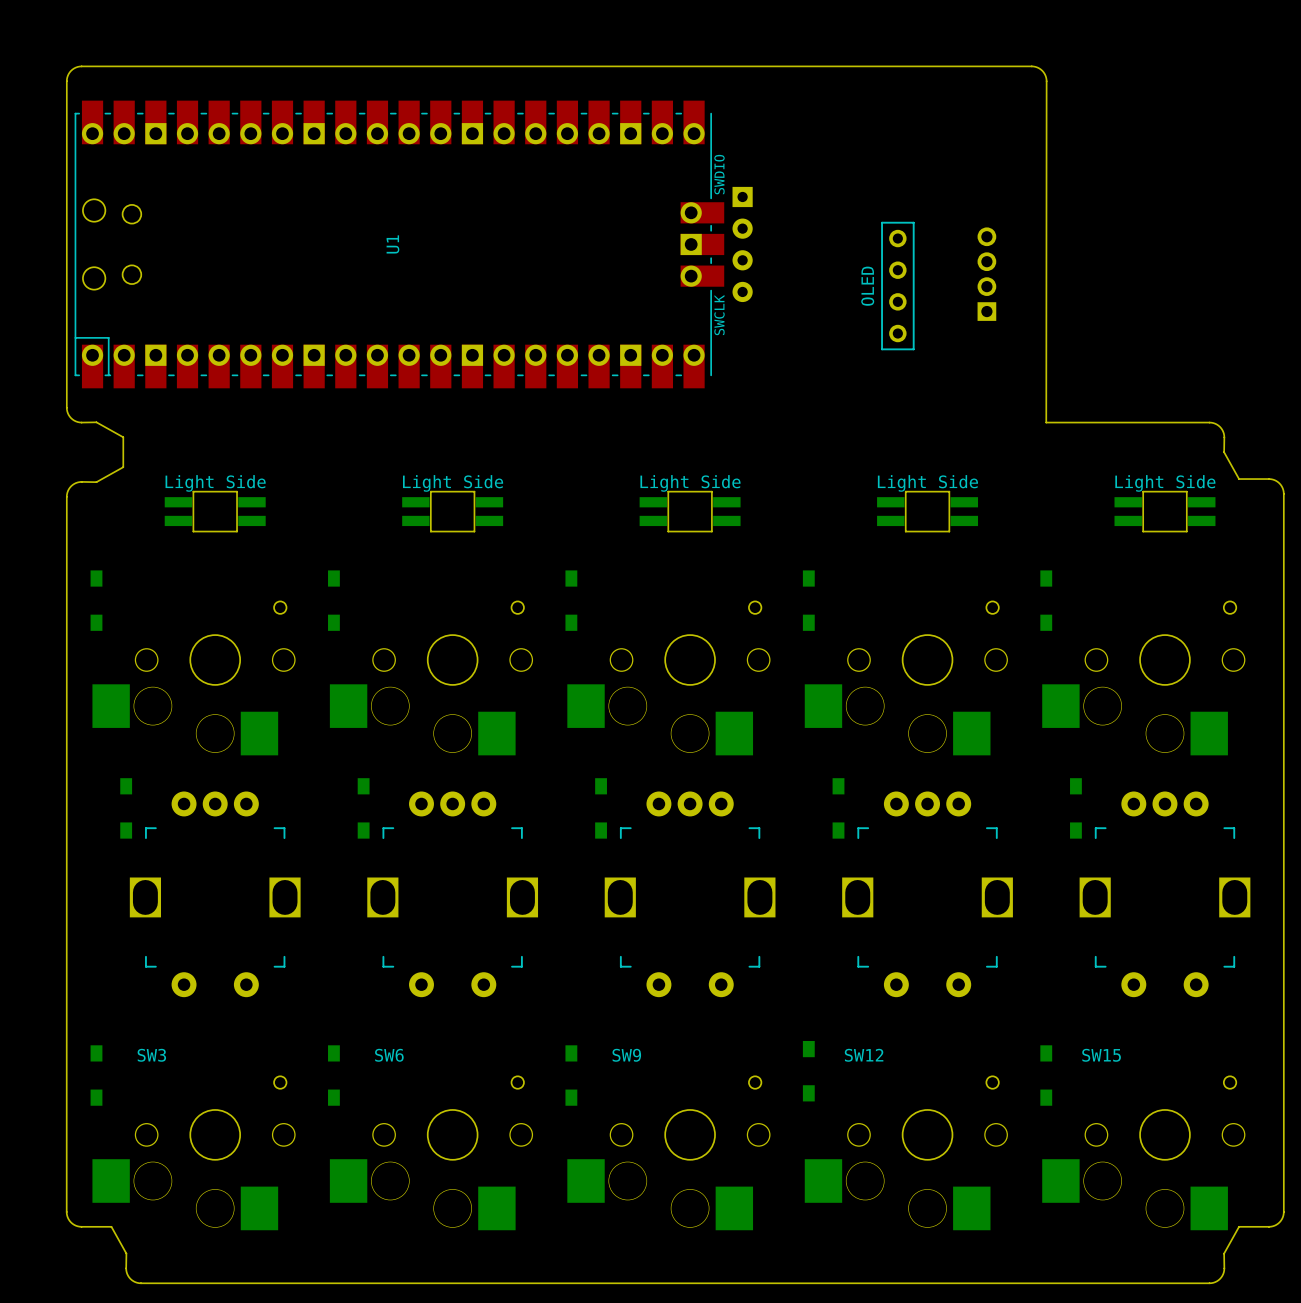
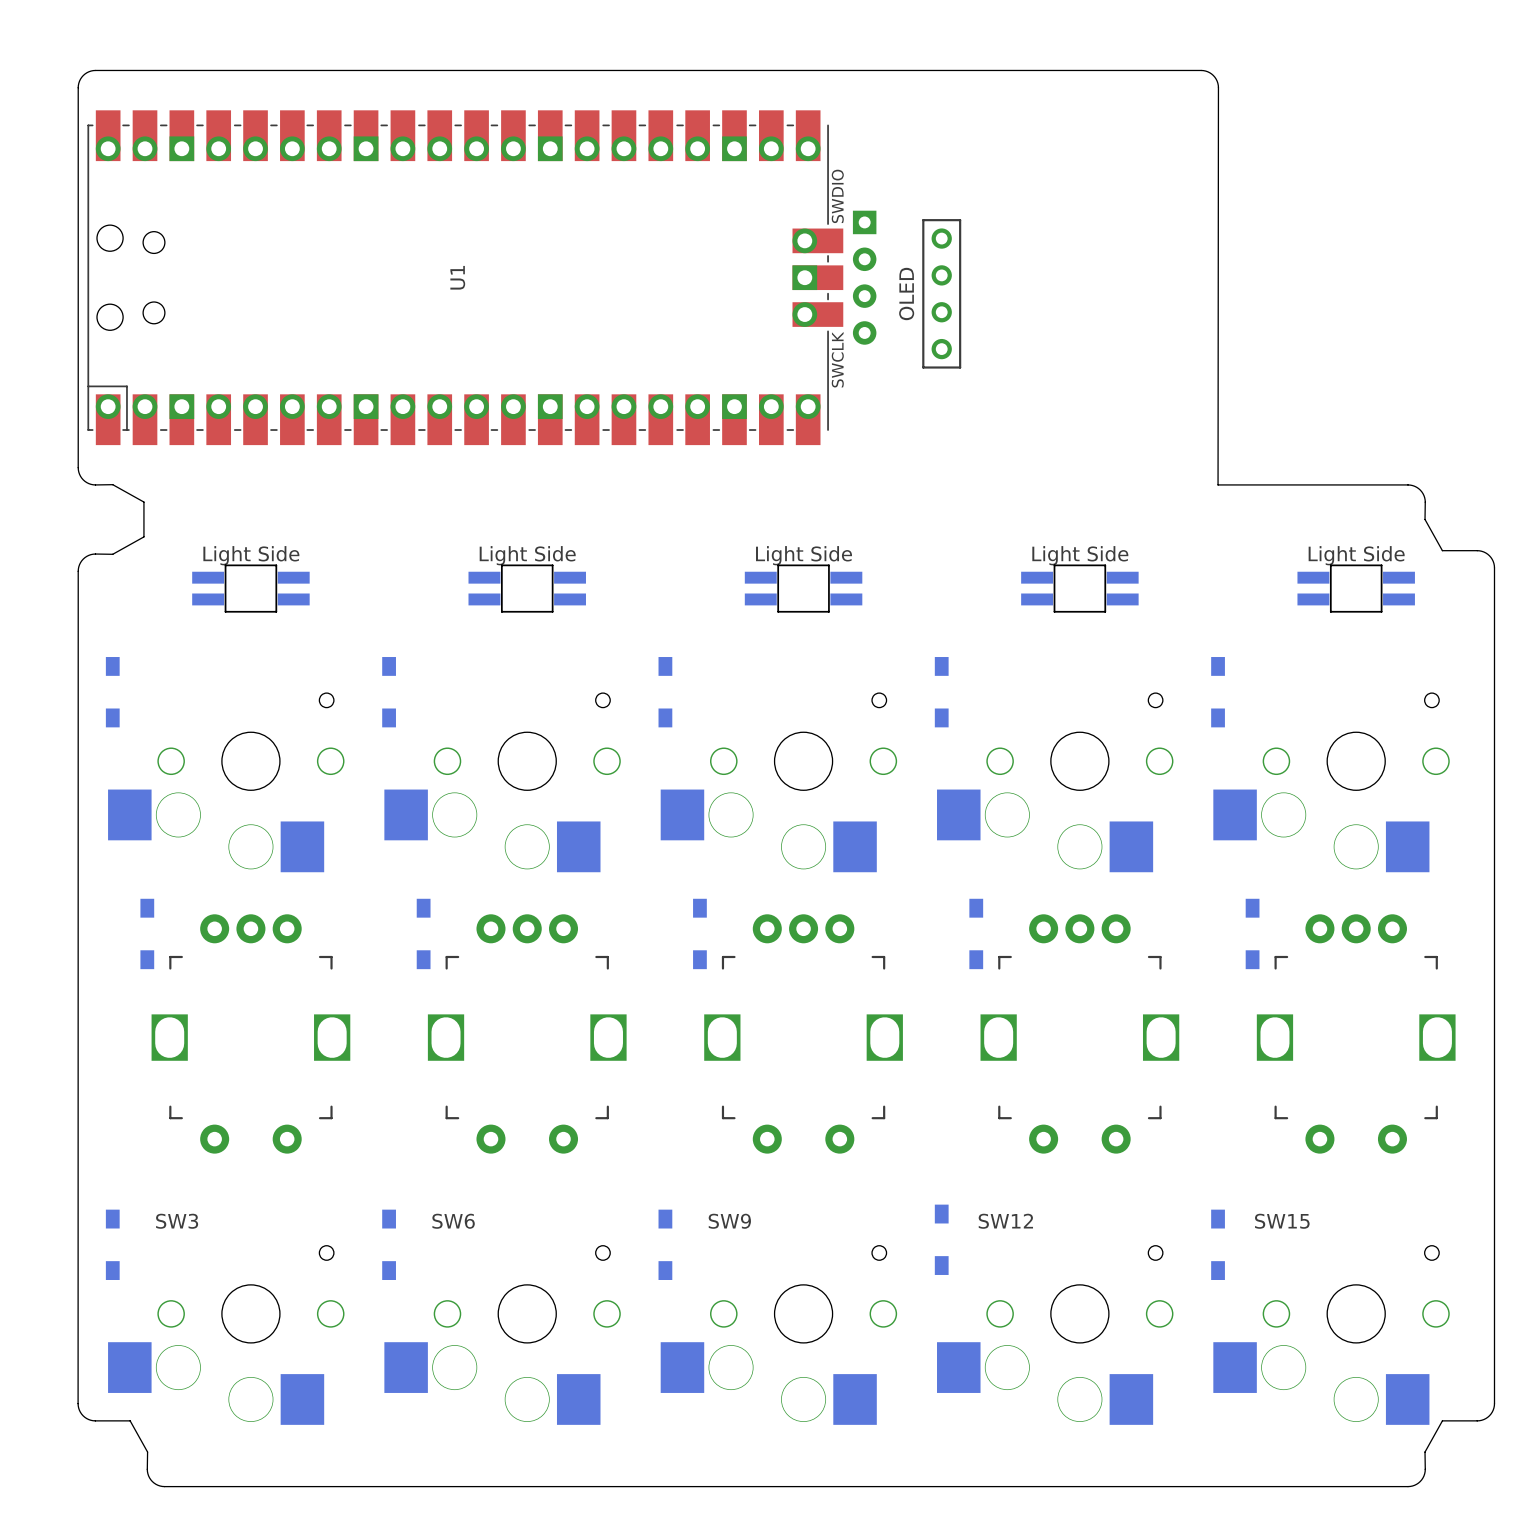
part: (986, 274) -> none
part position: (897, 286) -> (941, 293)

